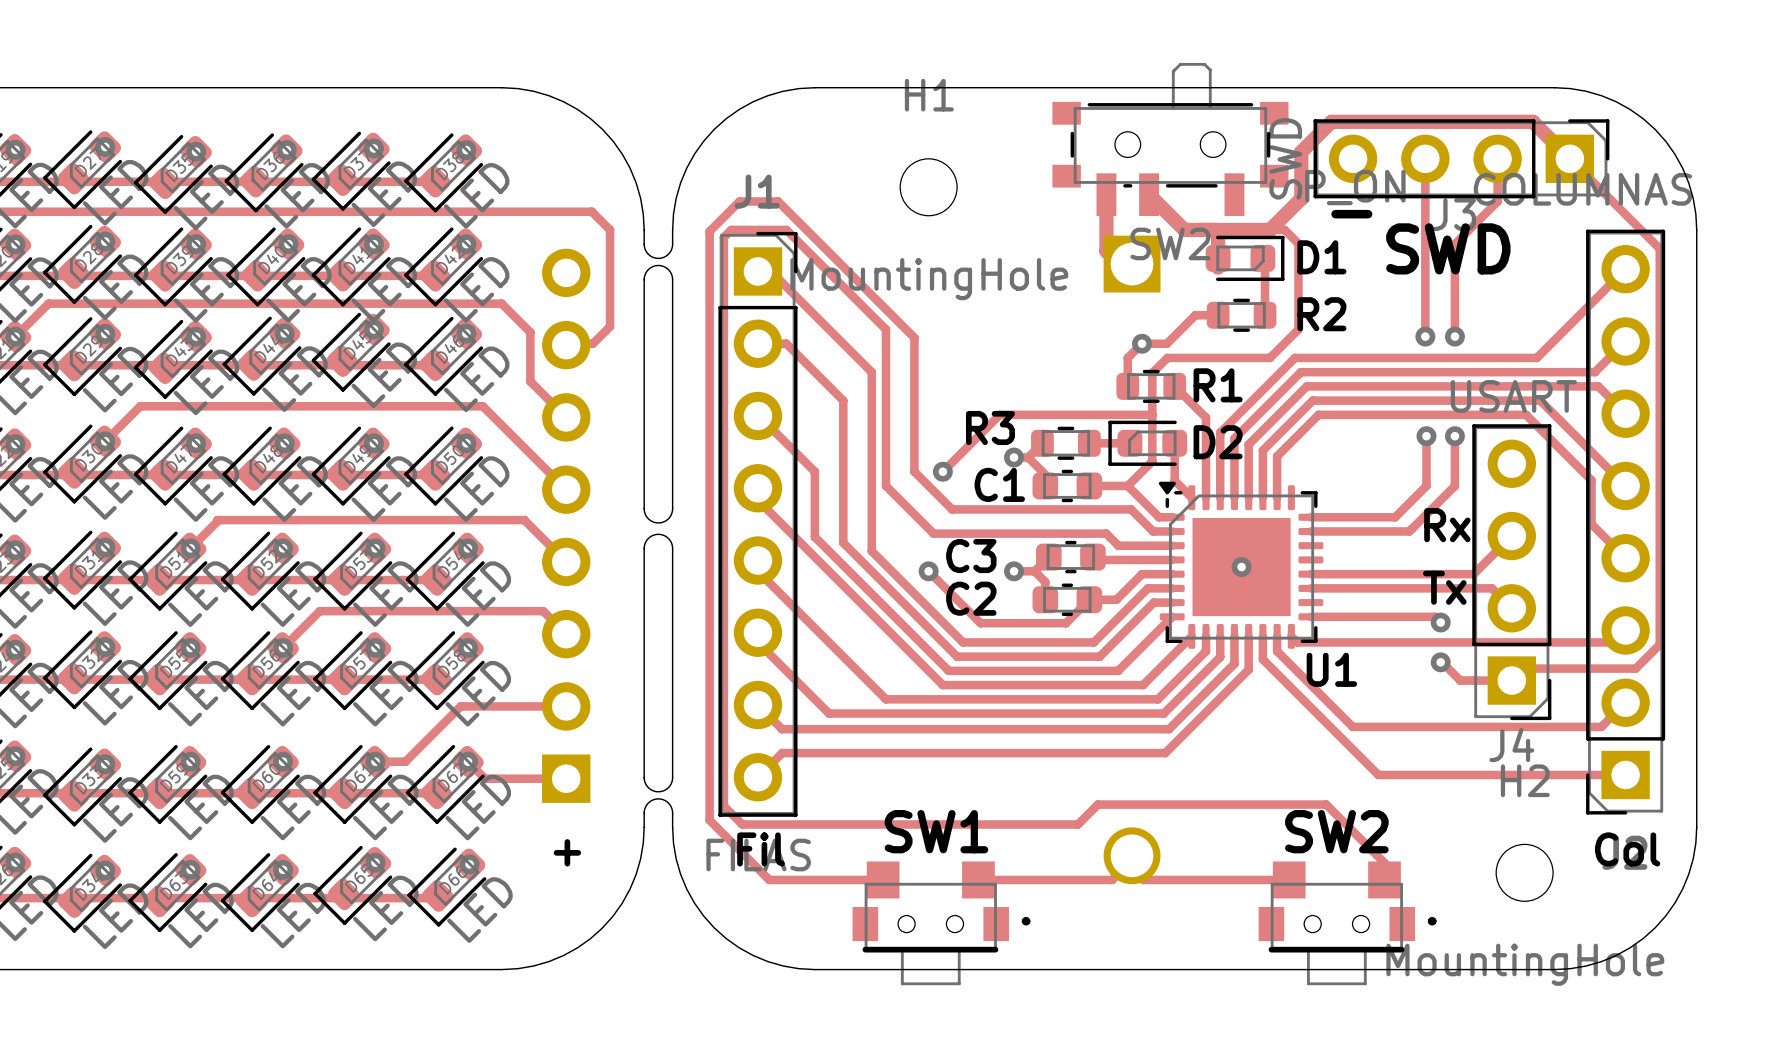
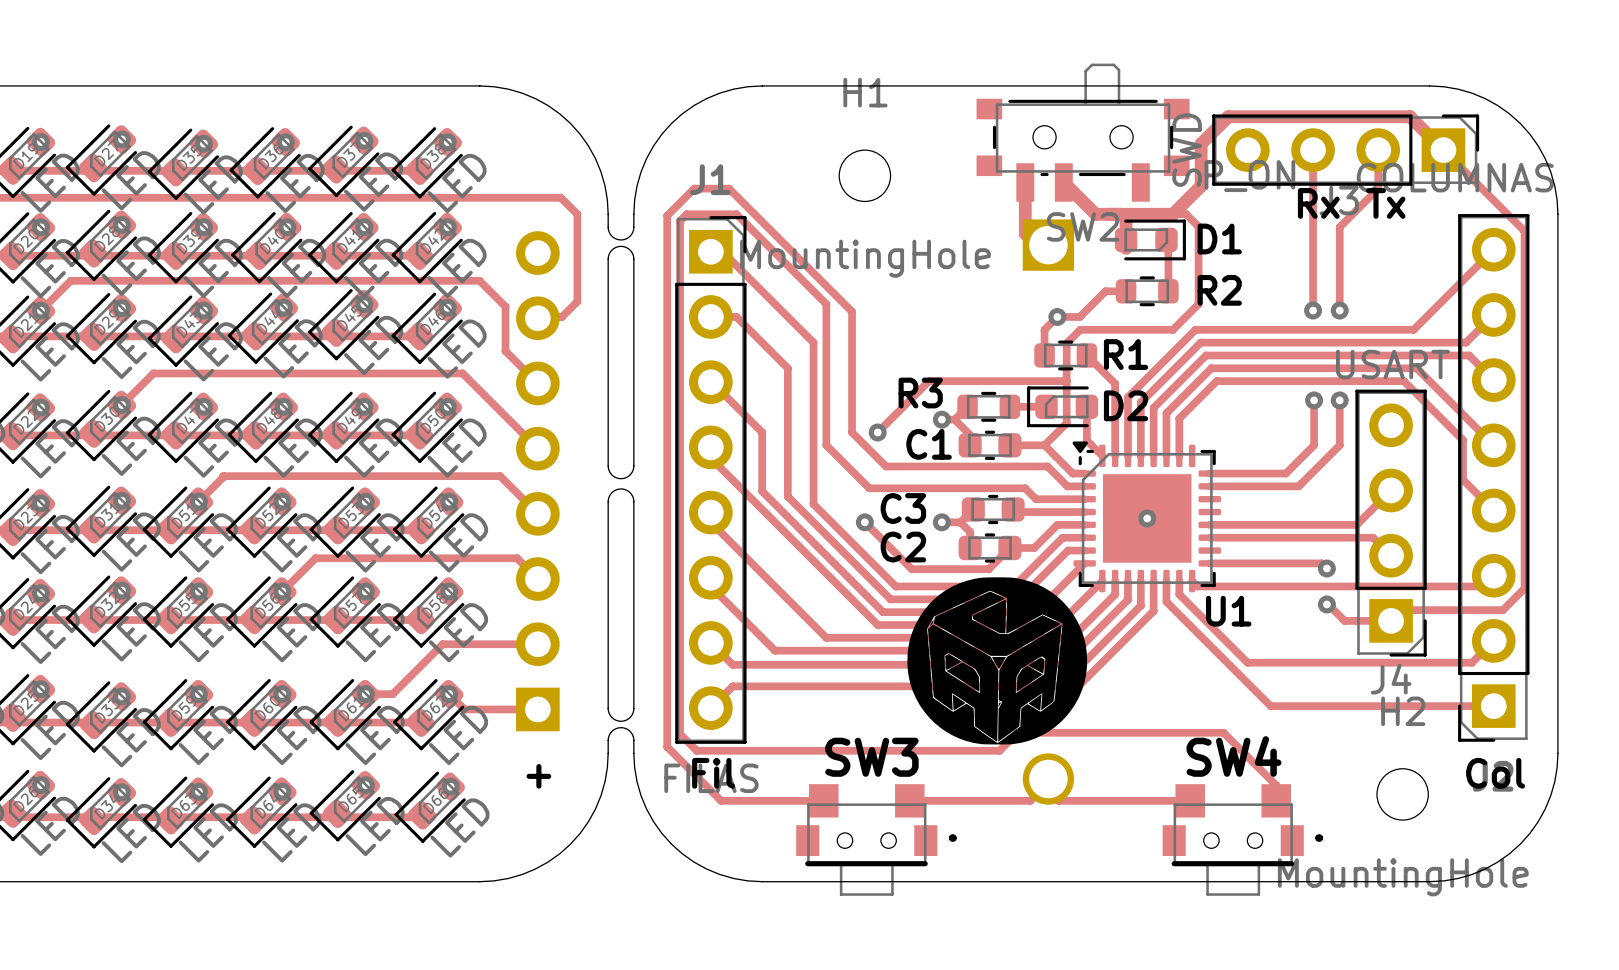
text: - (1351, 214) -> none
text: SWD (1448, 248) -> none
text position: Rx (1447, 525) -> Rx (1318, 203)
text position: Tx (1444, 587) -> Tx (1385, 203)
drawing: none -> [907, 577, 1088, 745]
SW1 name: SW1 (936, 831) -> SW3 (871, 757)
SW2 name: SW2 (1336, 831) -> SW4 (1234, 756)

